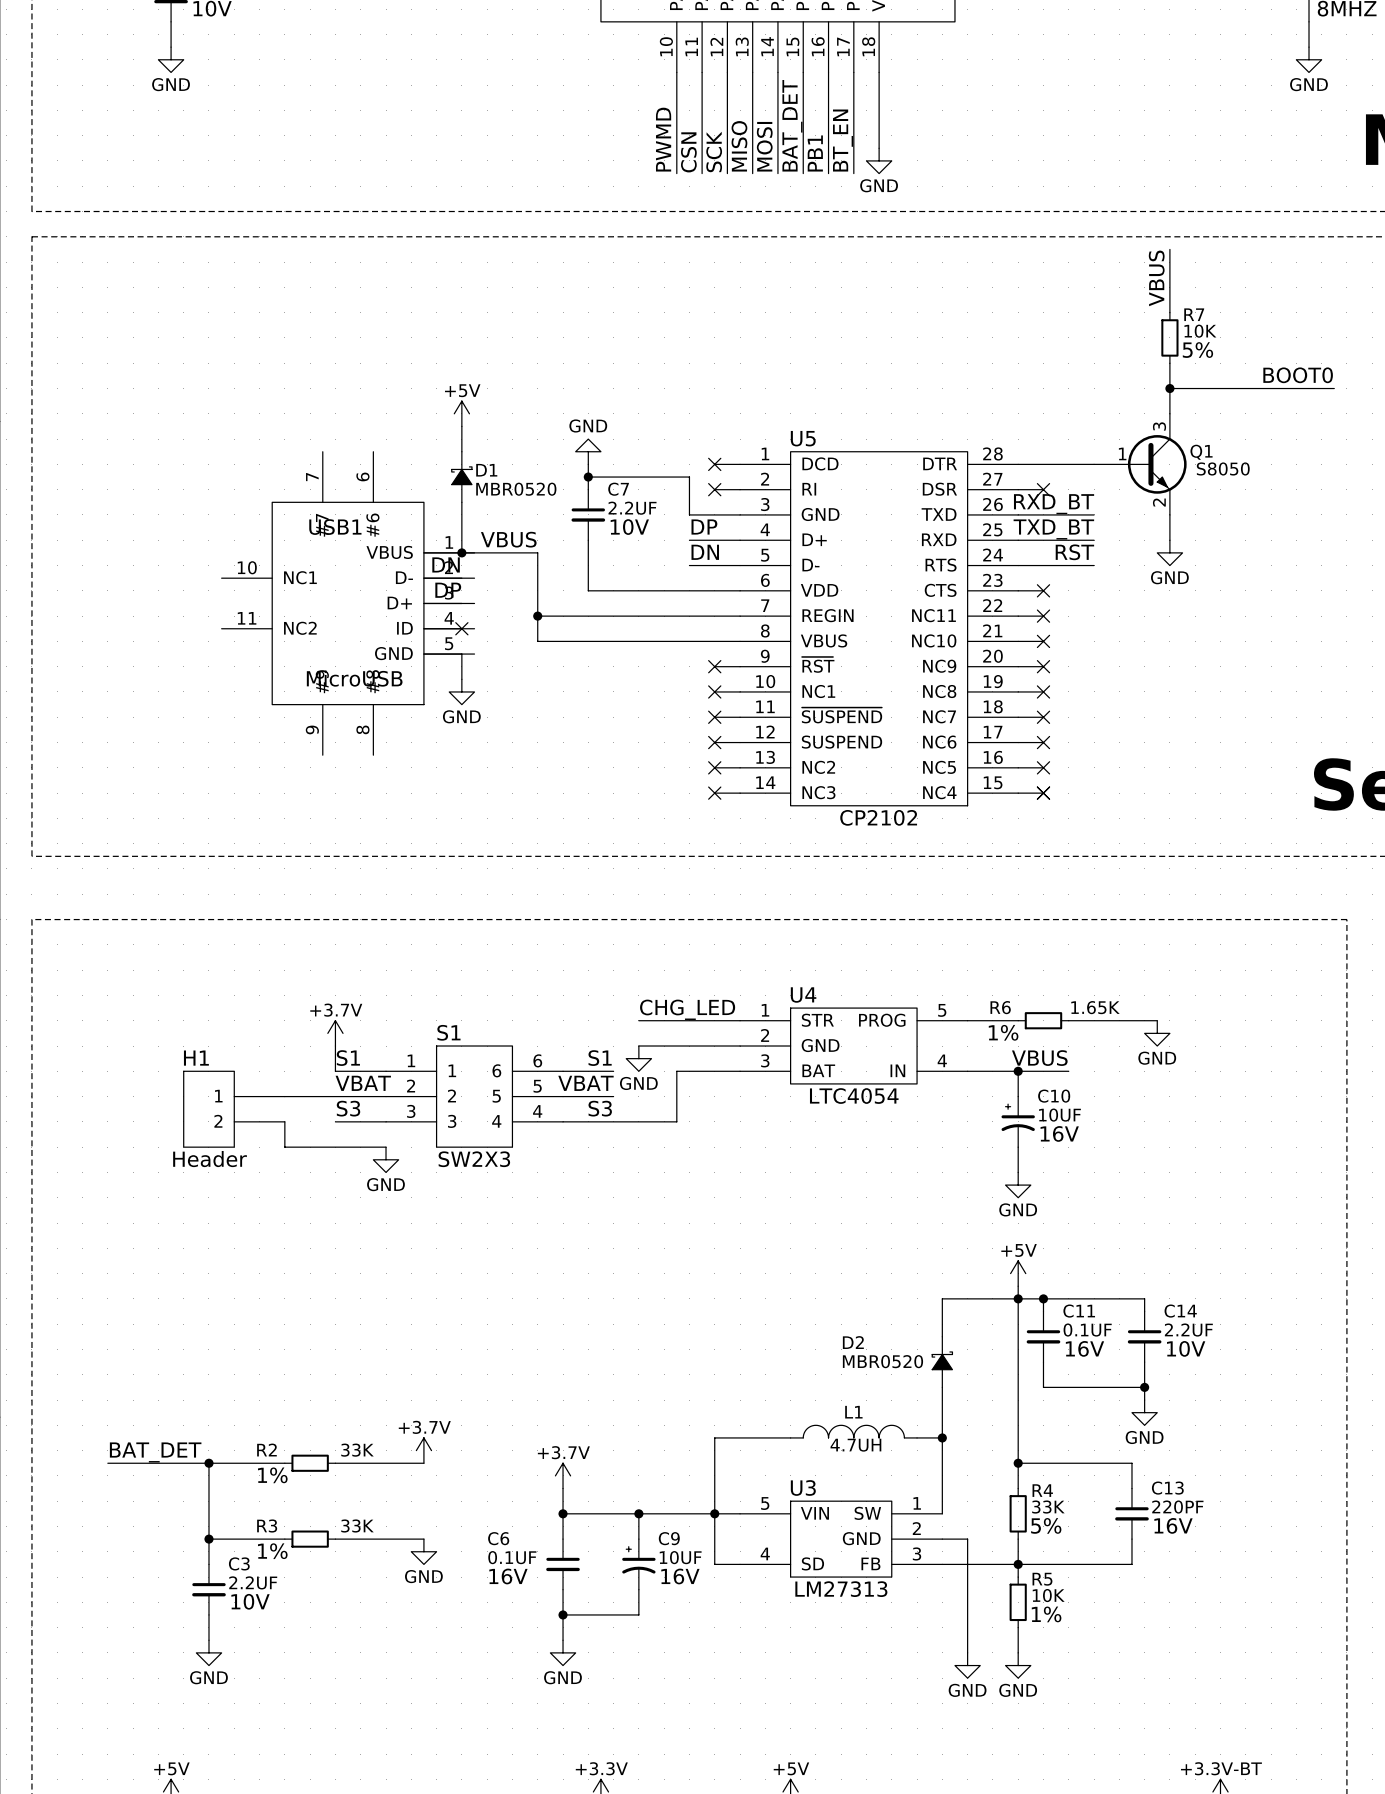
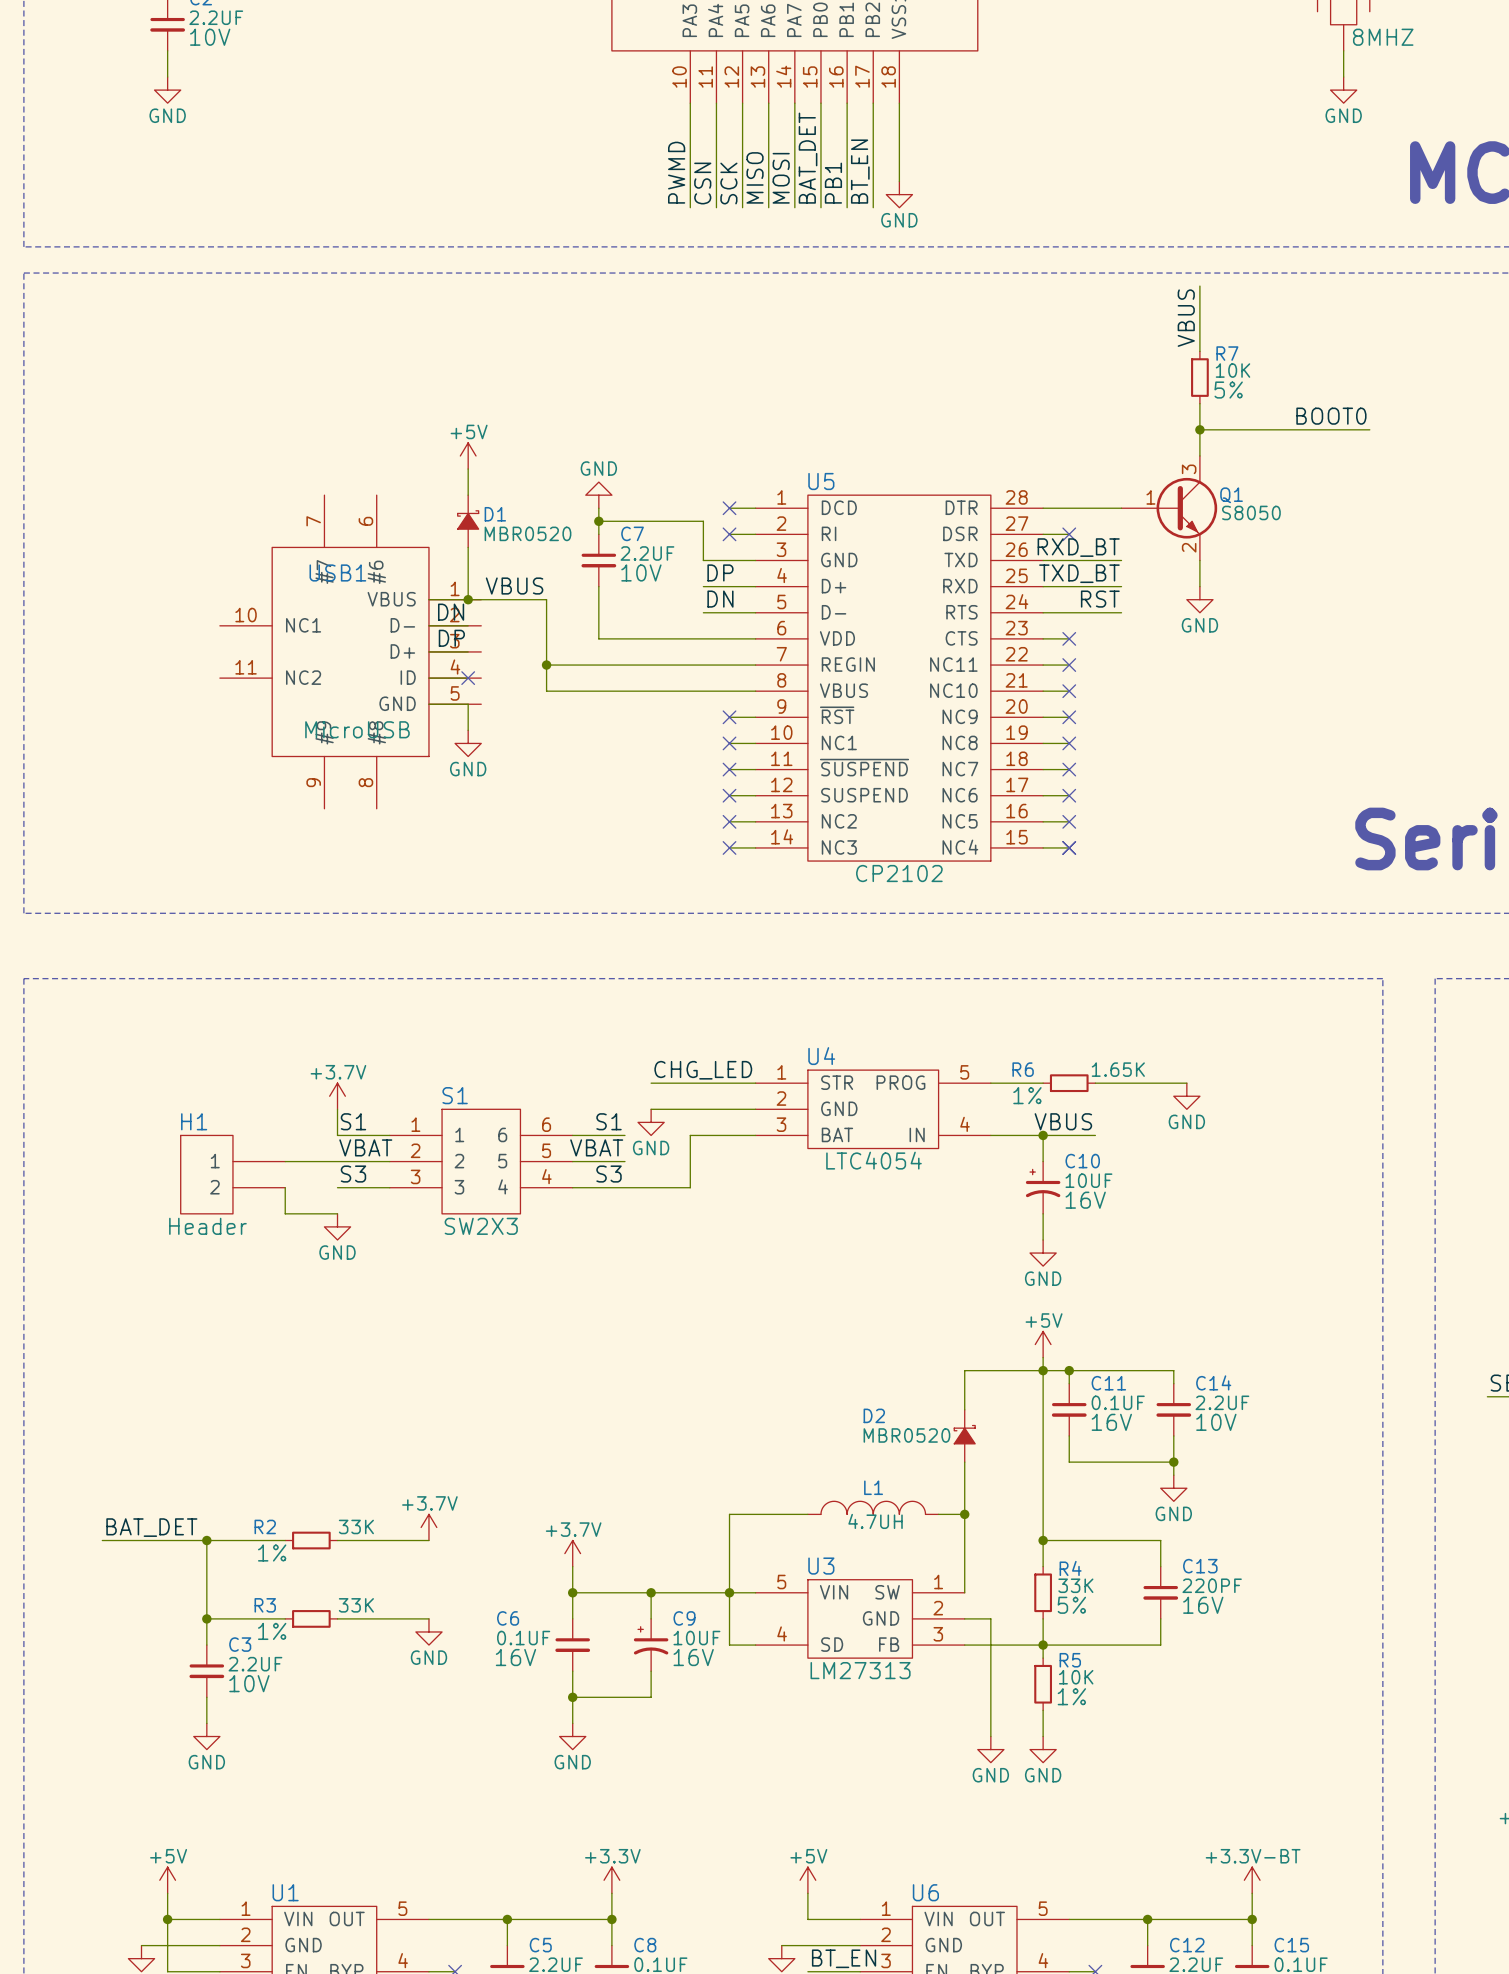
wire: (335, 1147) (386, 1147) -> none
power symbol position: GND (386, 1159) -> GND (337, 1226)

